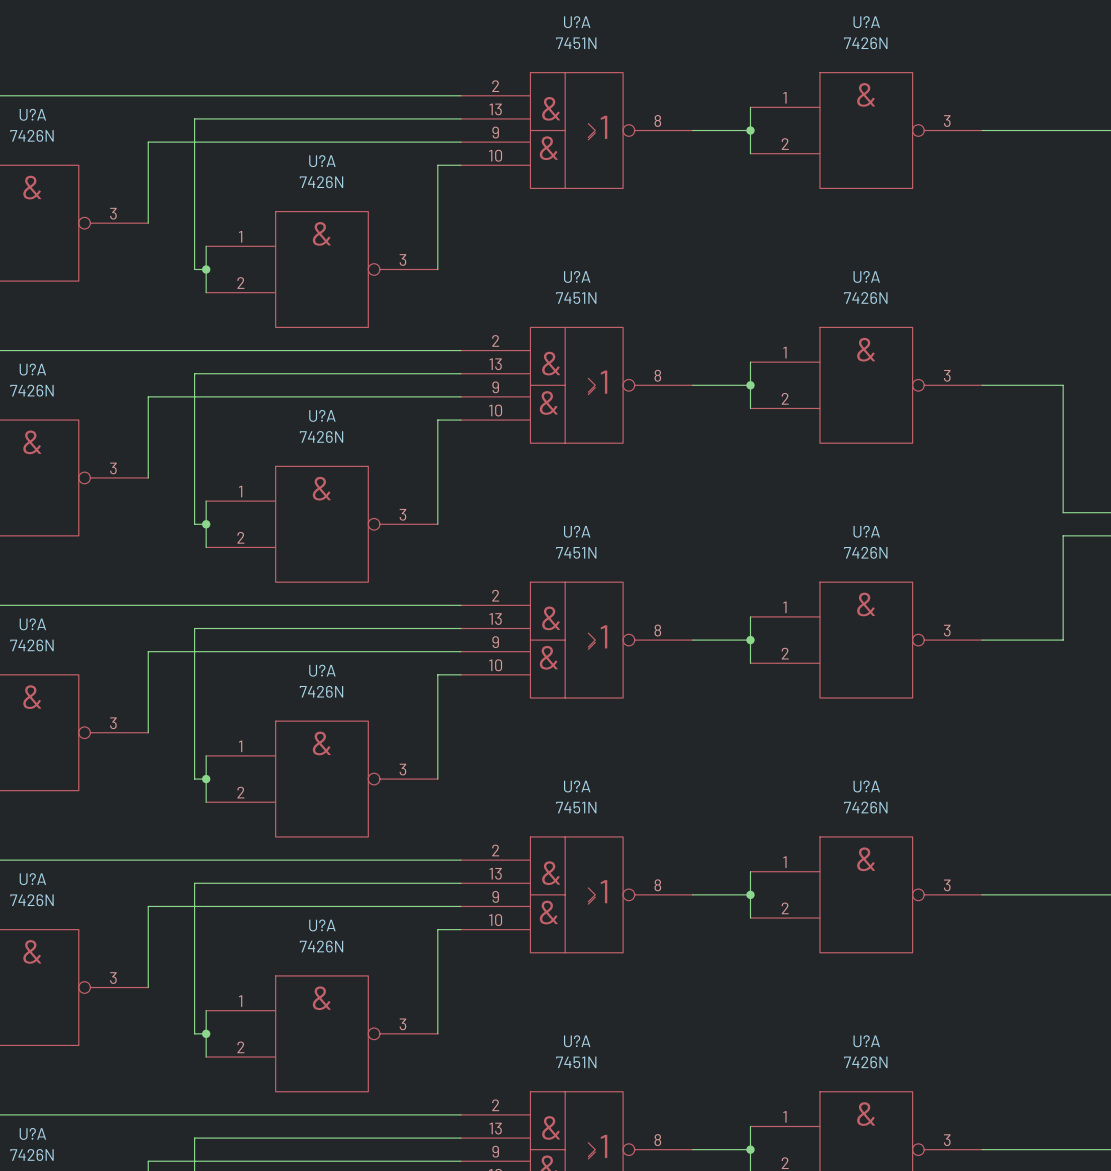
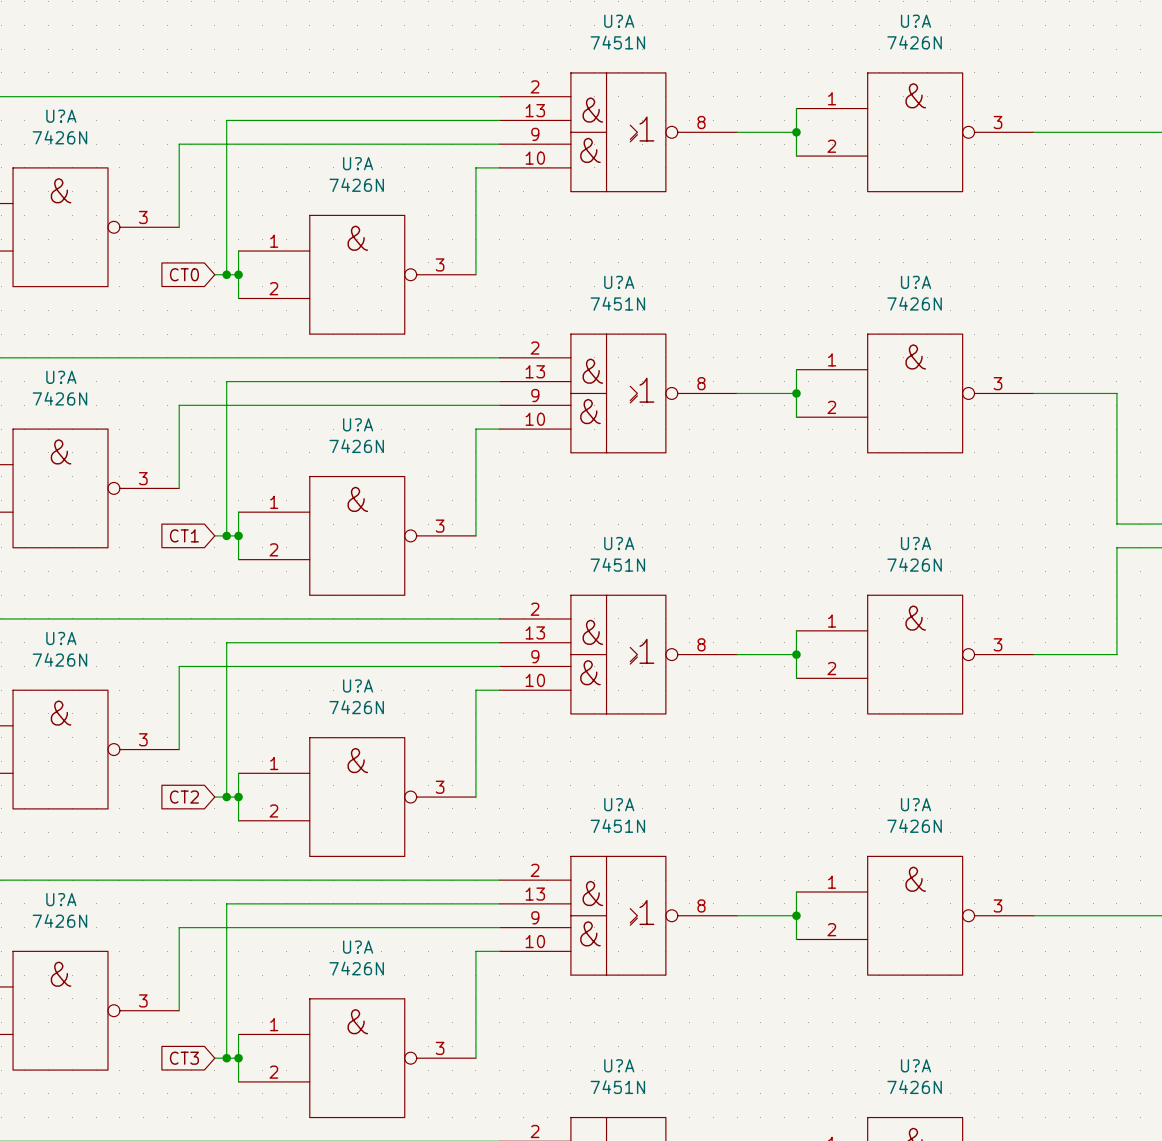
global label: none -> CT0 (184, 274)
wire: none -> (214, 274) (226, 274)
junction: none -> (226, 274)
global label: none -> CT1 (184, 535)
wire: none -> (214, 535) (226, 535)
junction: none -> (226, 535)
global label: none -> CT2 (184, 797)
wire: none -> (214, 797) (226, 797)
junction: none -> (226, 797)
global label: none -> CT3 (184, 1058)
wire: none -> (214, 1058) (226, 1058)
junction: none -> (226, 1058)

